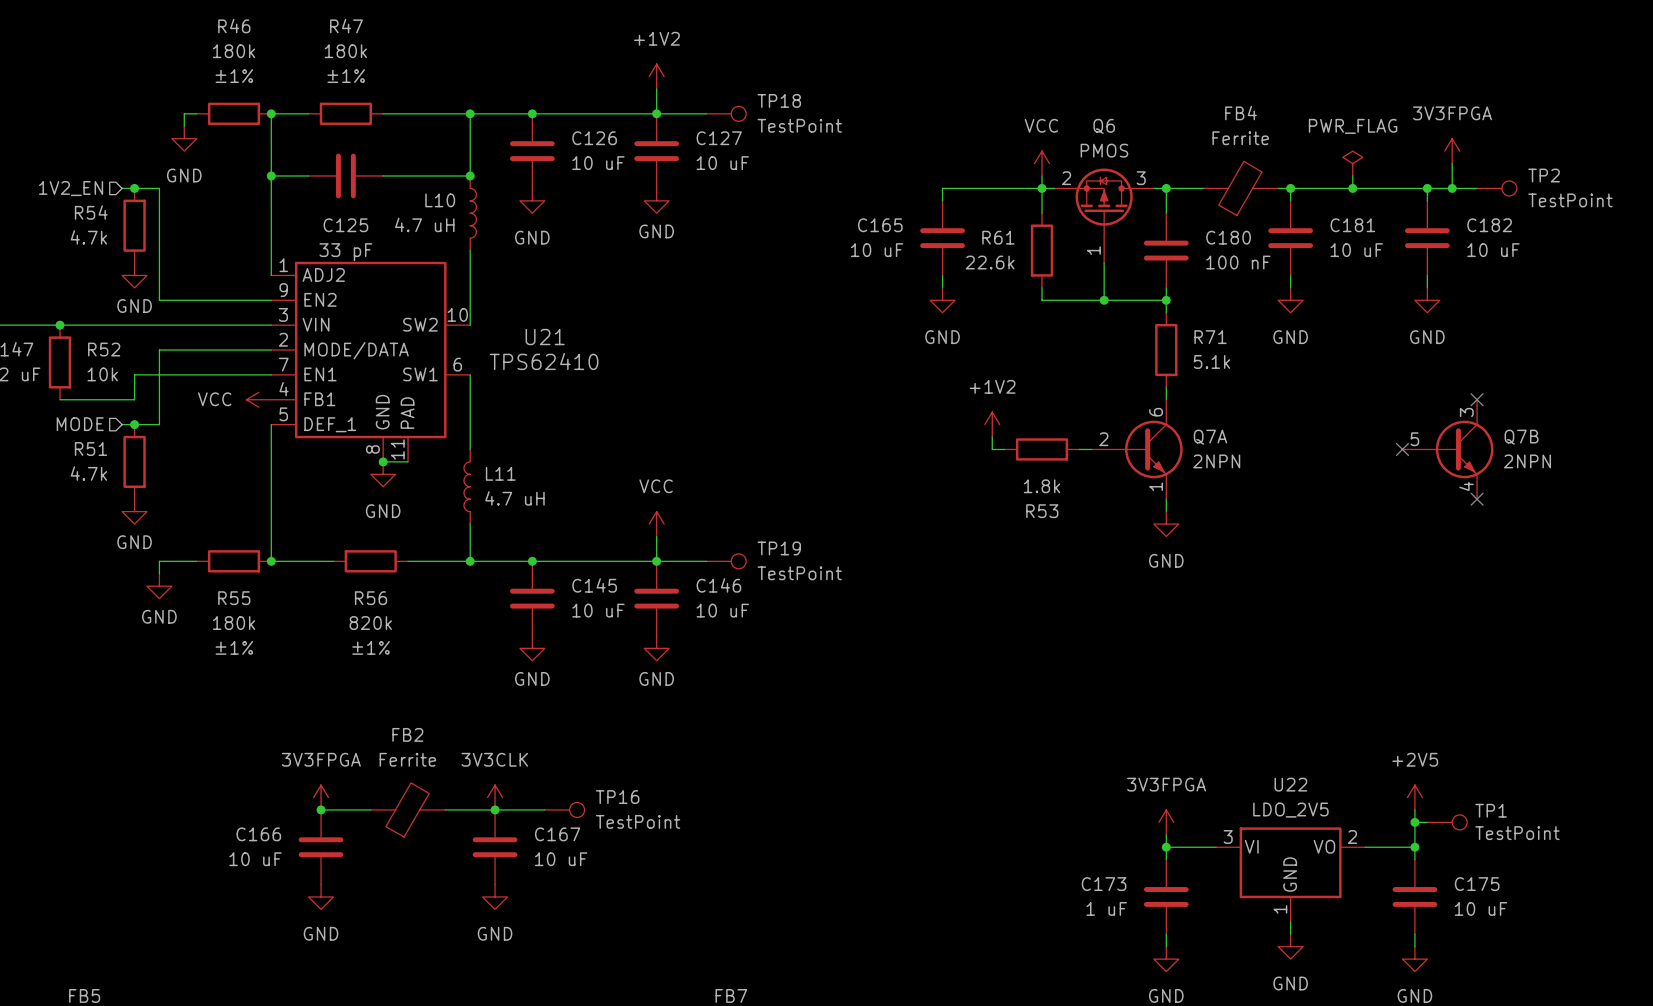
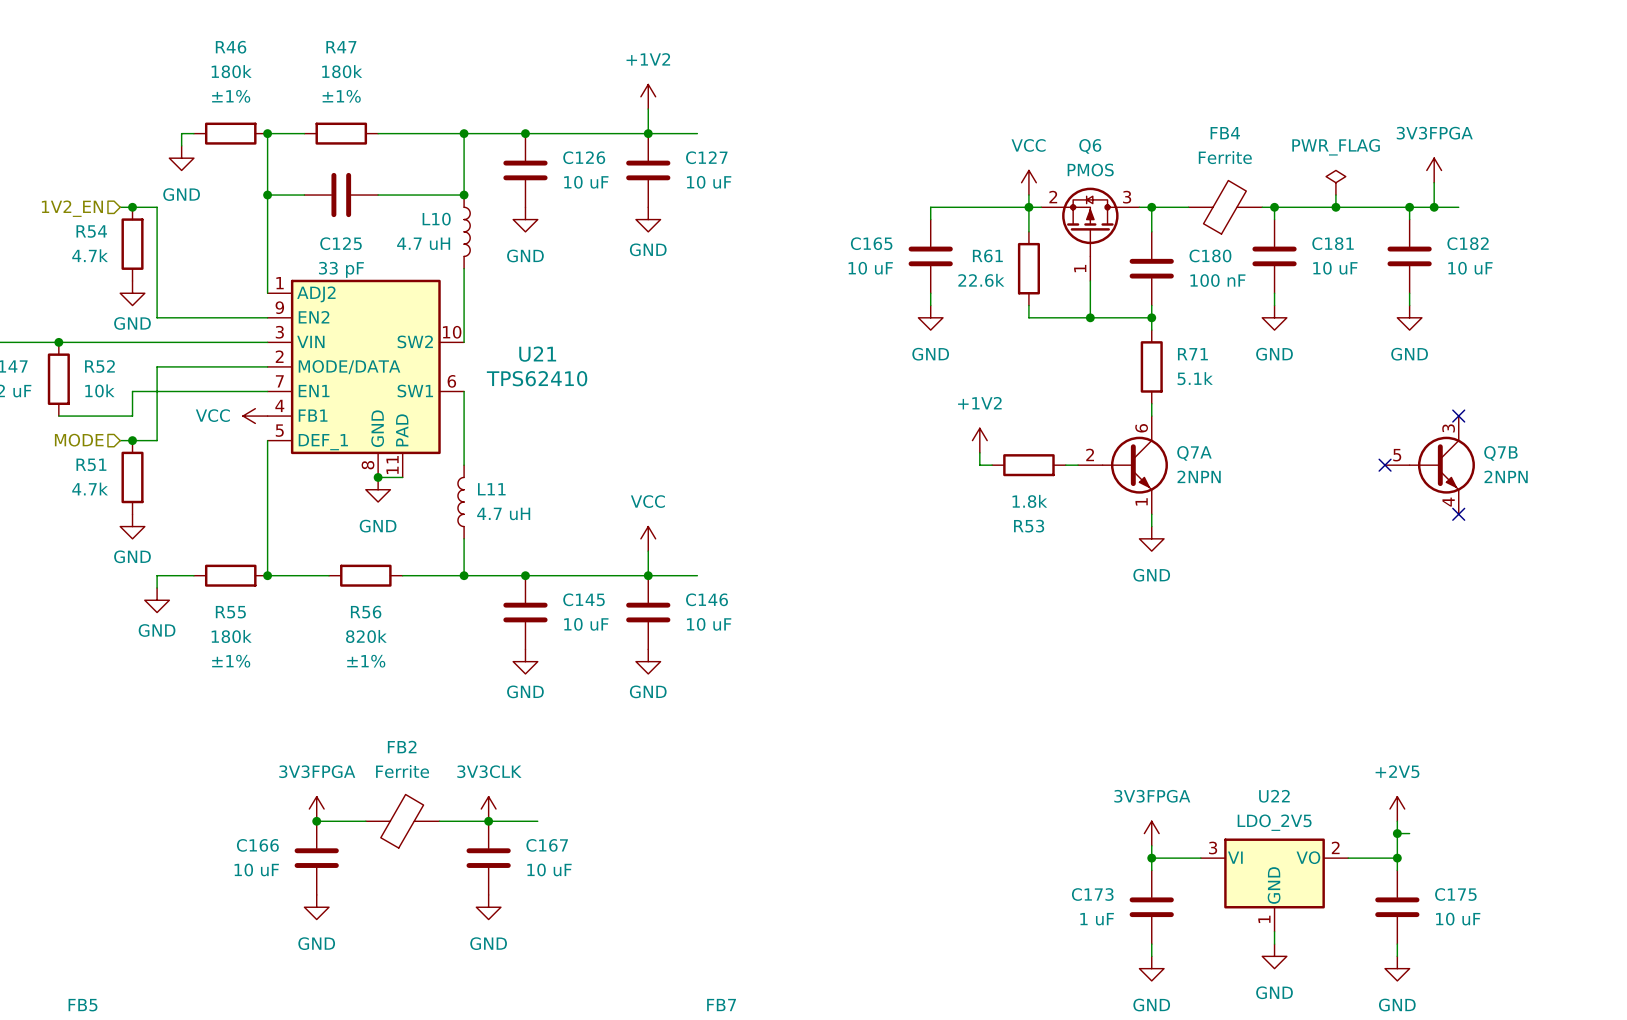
TP18: TestPoint (726, 113) -> none
TP2: TestPoint (1496, 188) -> none
TP19: TestPoint (726, 561) -> none
TP16: TestPoint (564, 809) -> none
TP1: TestPoint (1447, 822) -> none

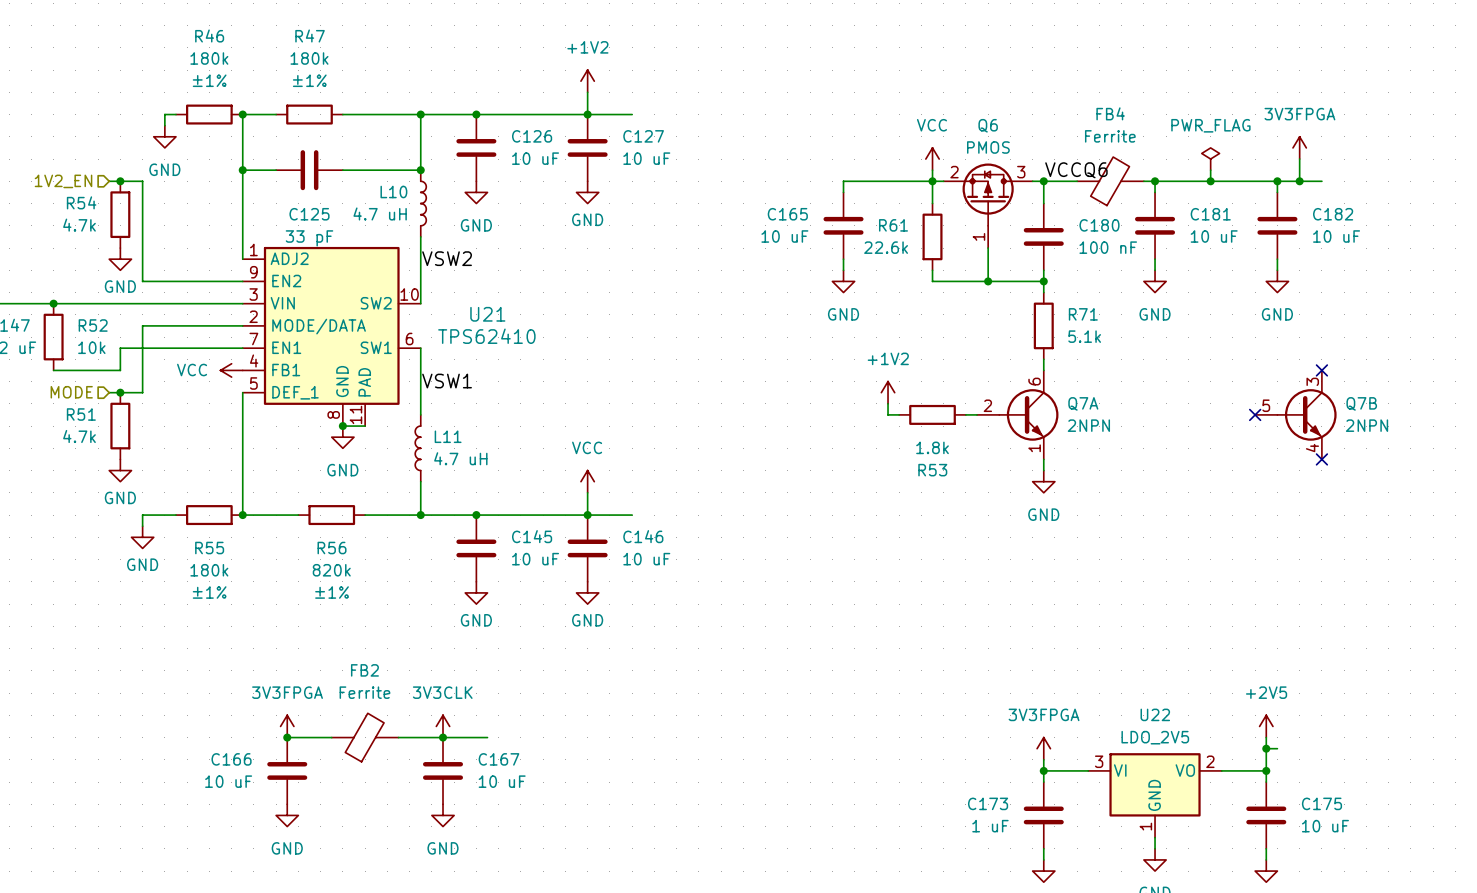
label: none -> VCCQ6 (1076, 170)
label: none -> VSW2 (447, 258)
label: none -> VSW1 (447, 381)

